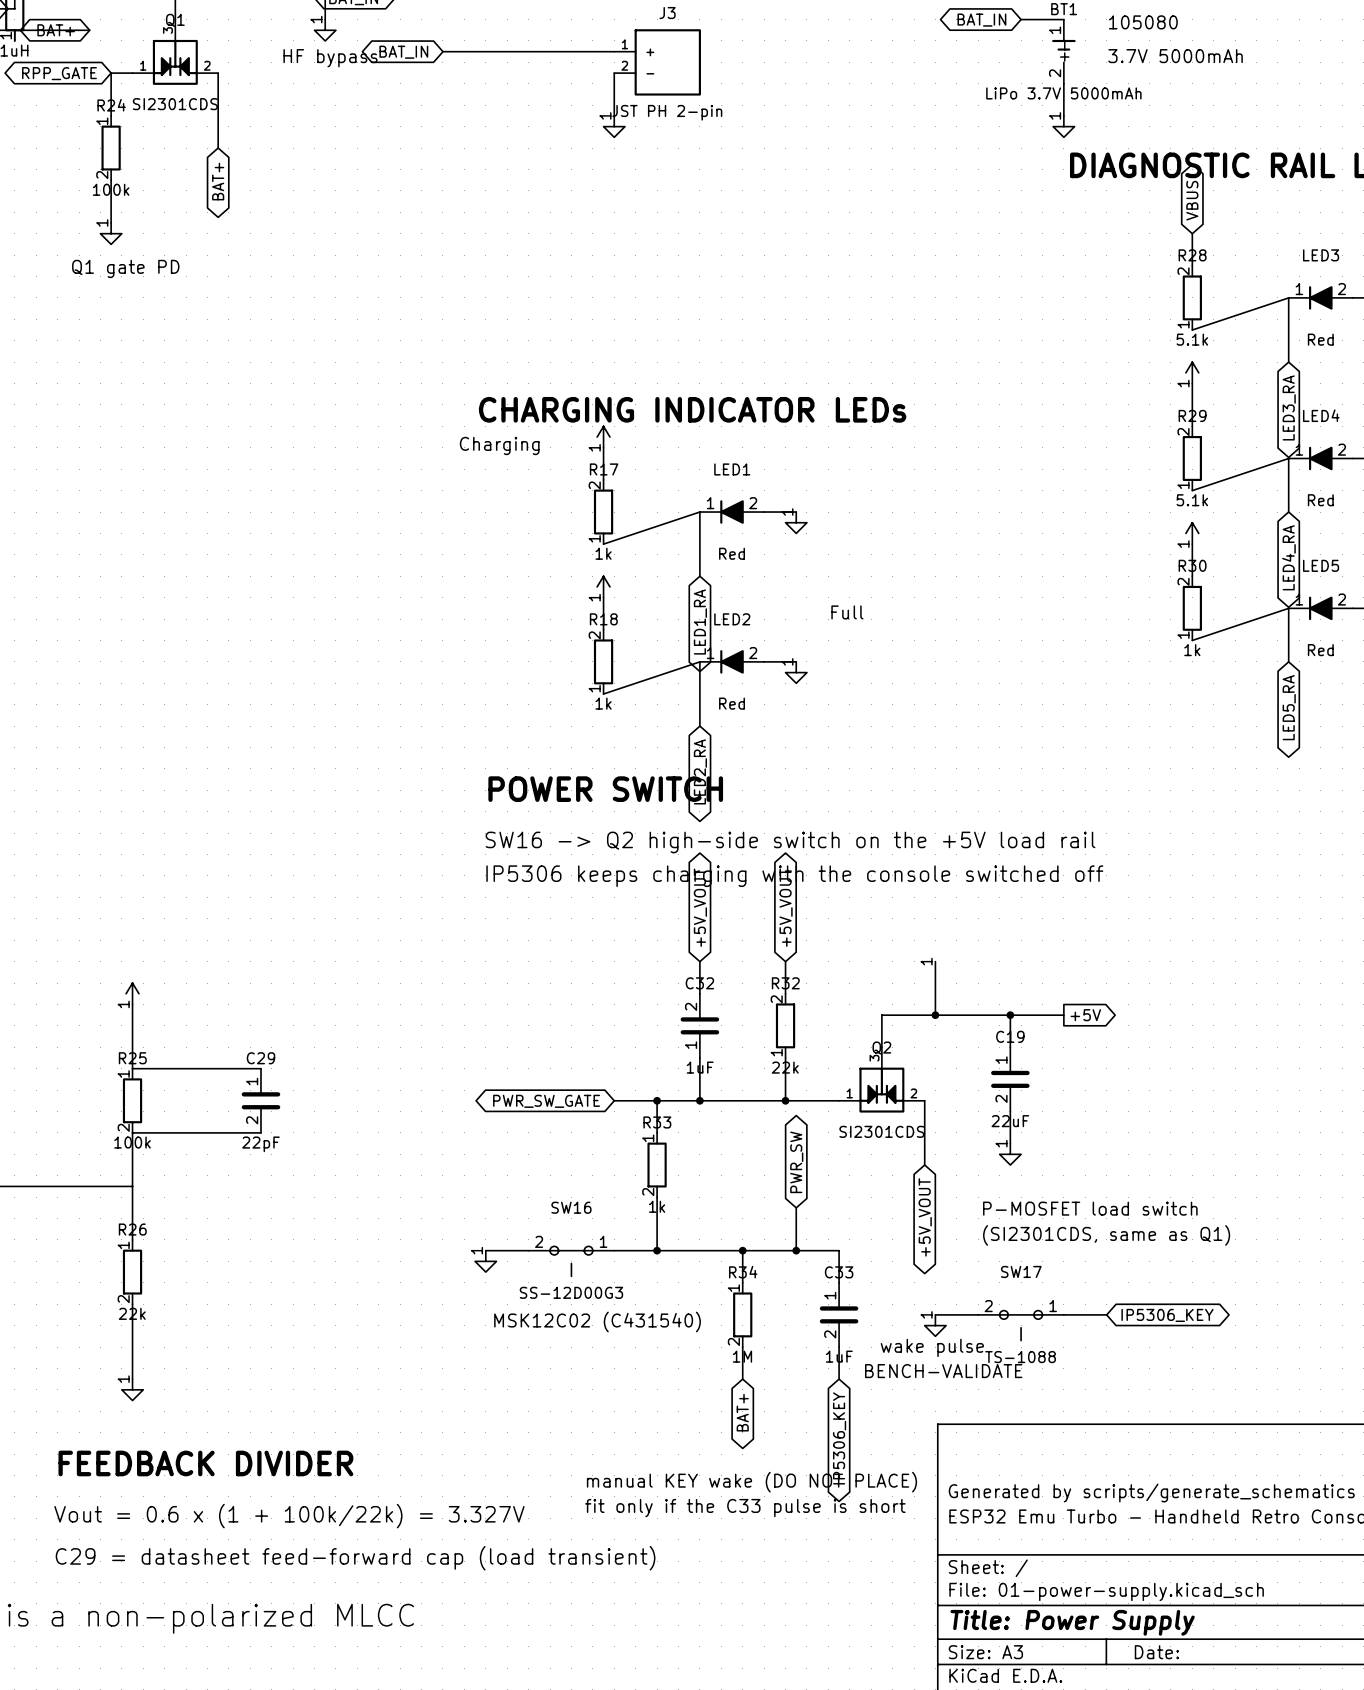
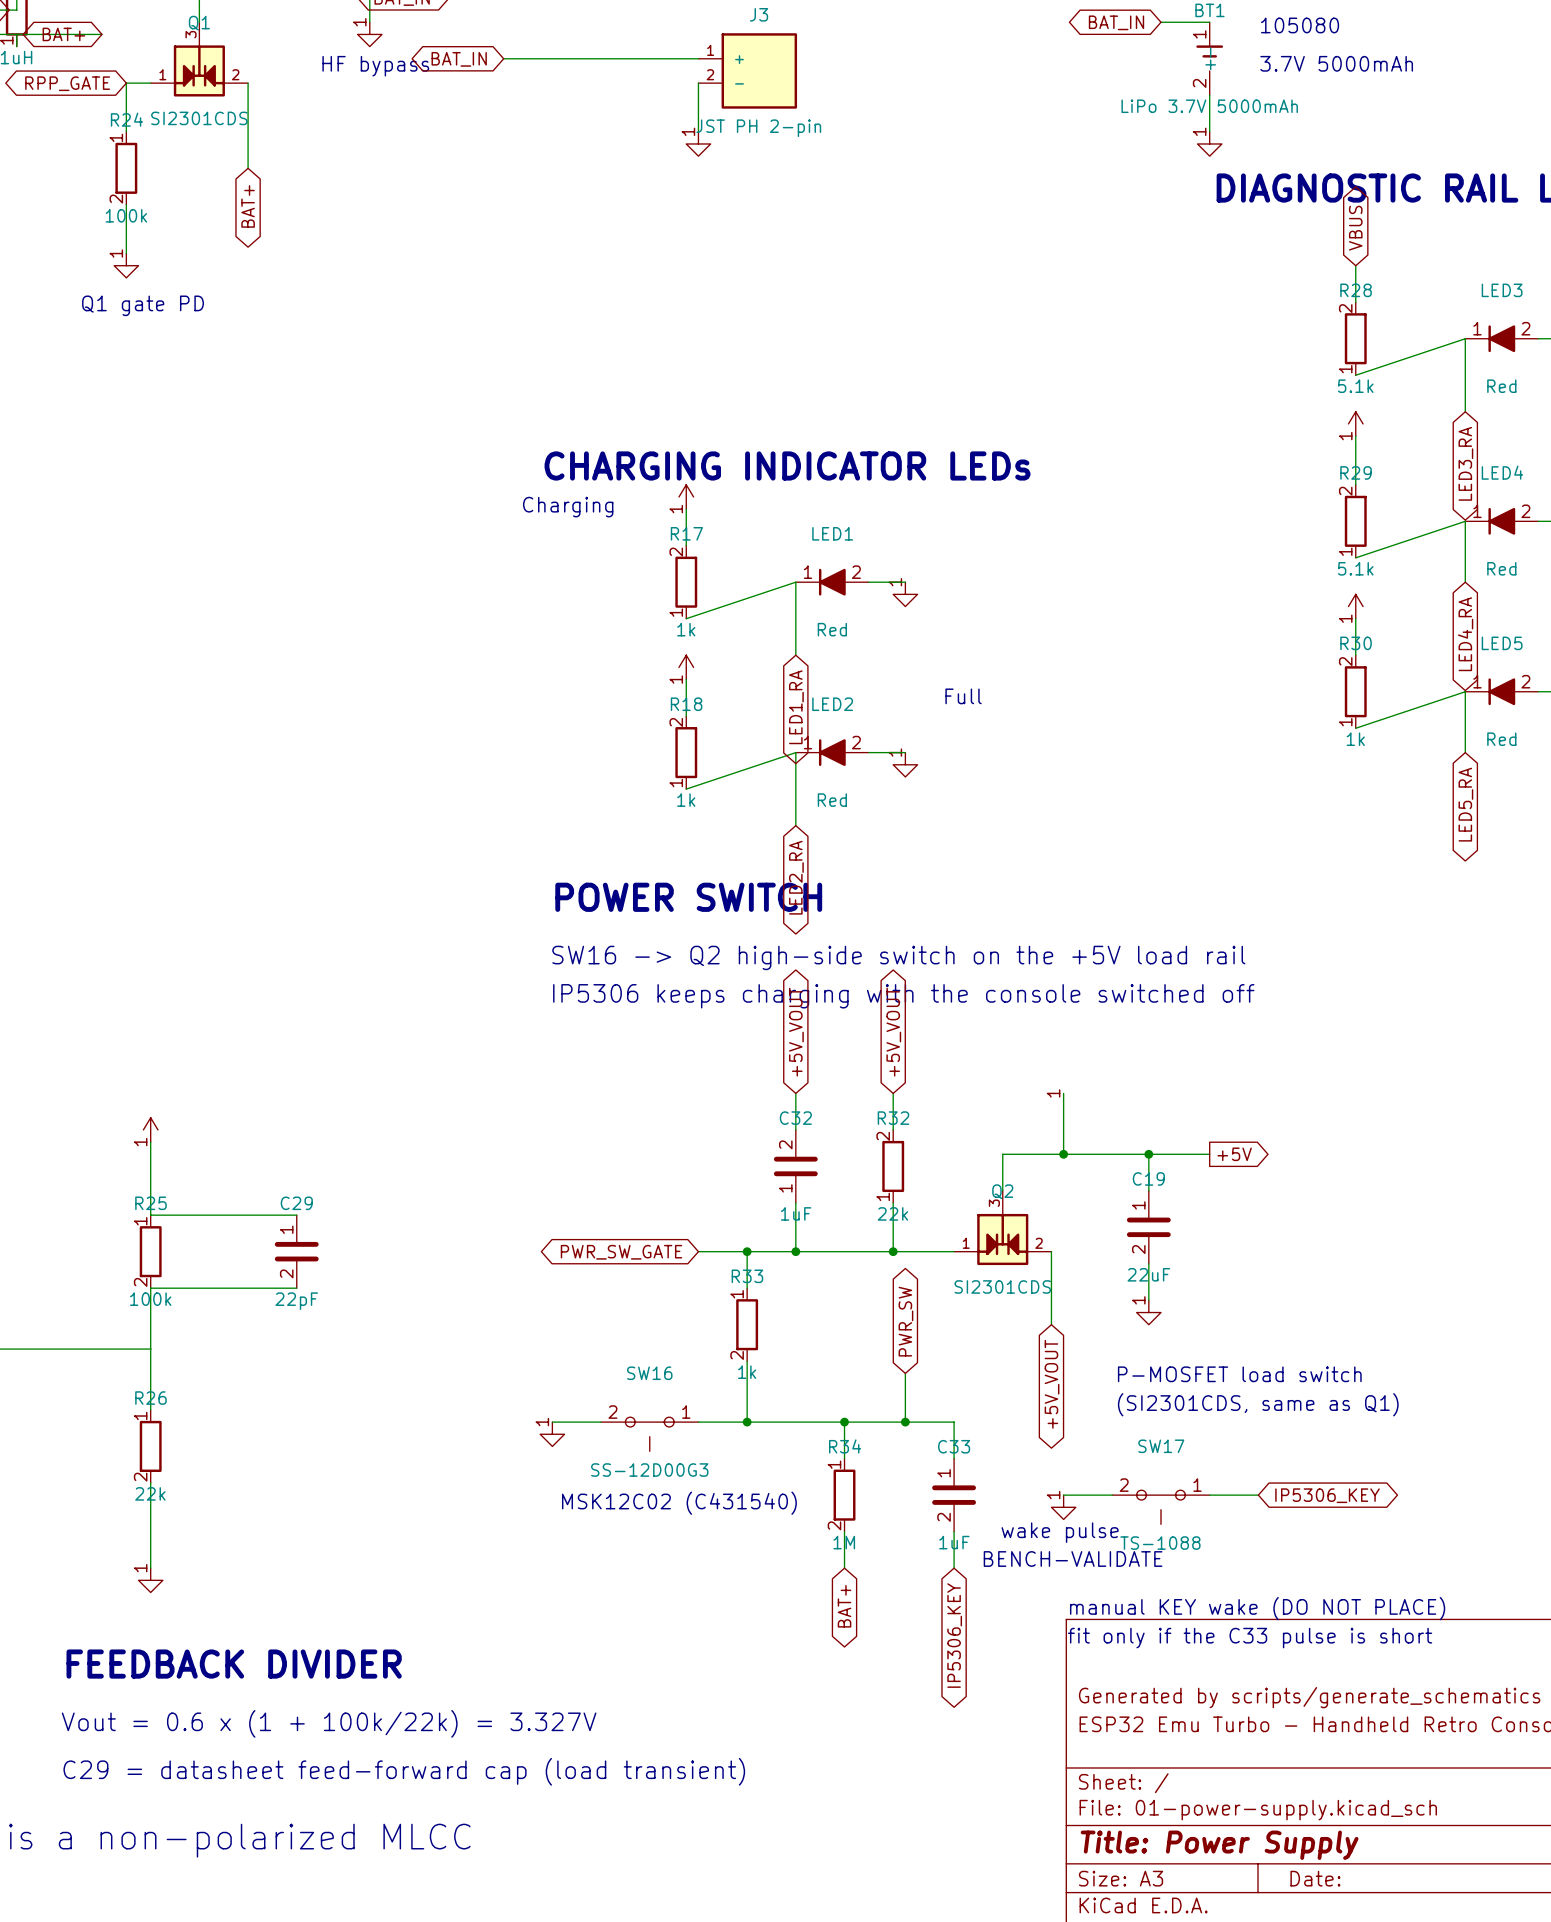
text: none -> manual KEY wake (DO NOT PLACE) (1257, 1608)
text: none -> fit only if the C33 pulse is short (1250, 1638)
text: manual KEY wake (DO NOT PLACE) (751, 1482) -> none
text: fit only if the C33 pulse is short (745, 1508) -> none

